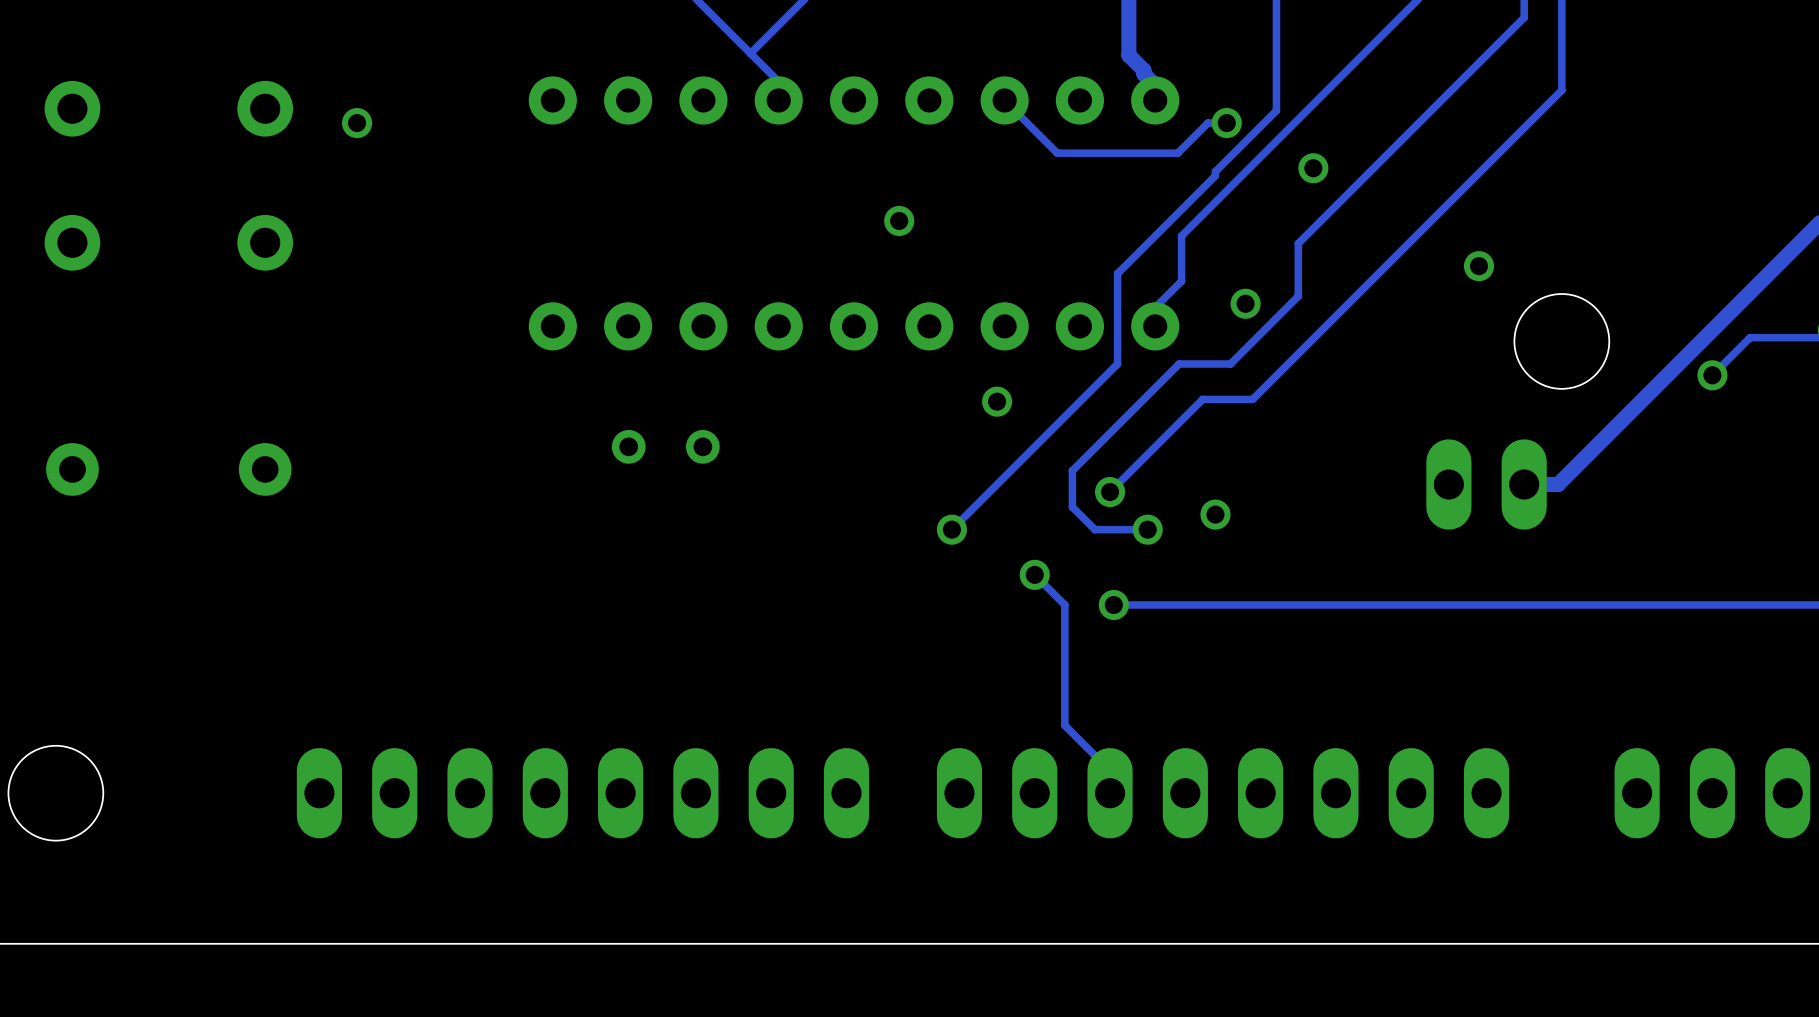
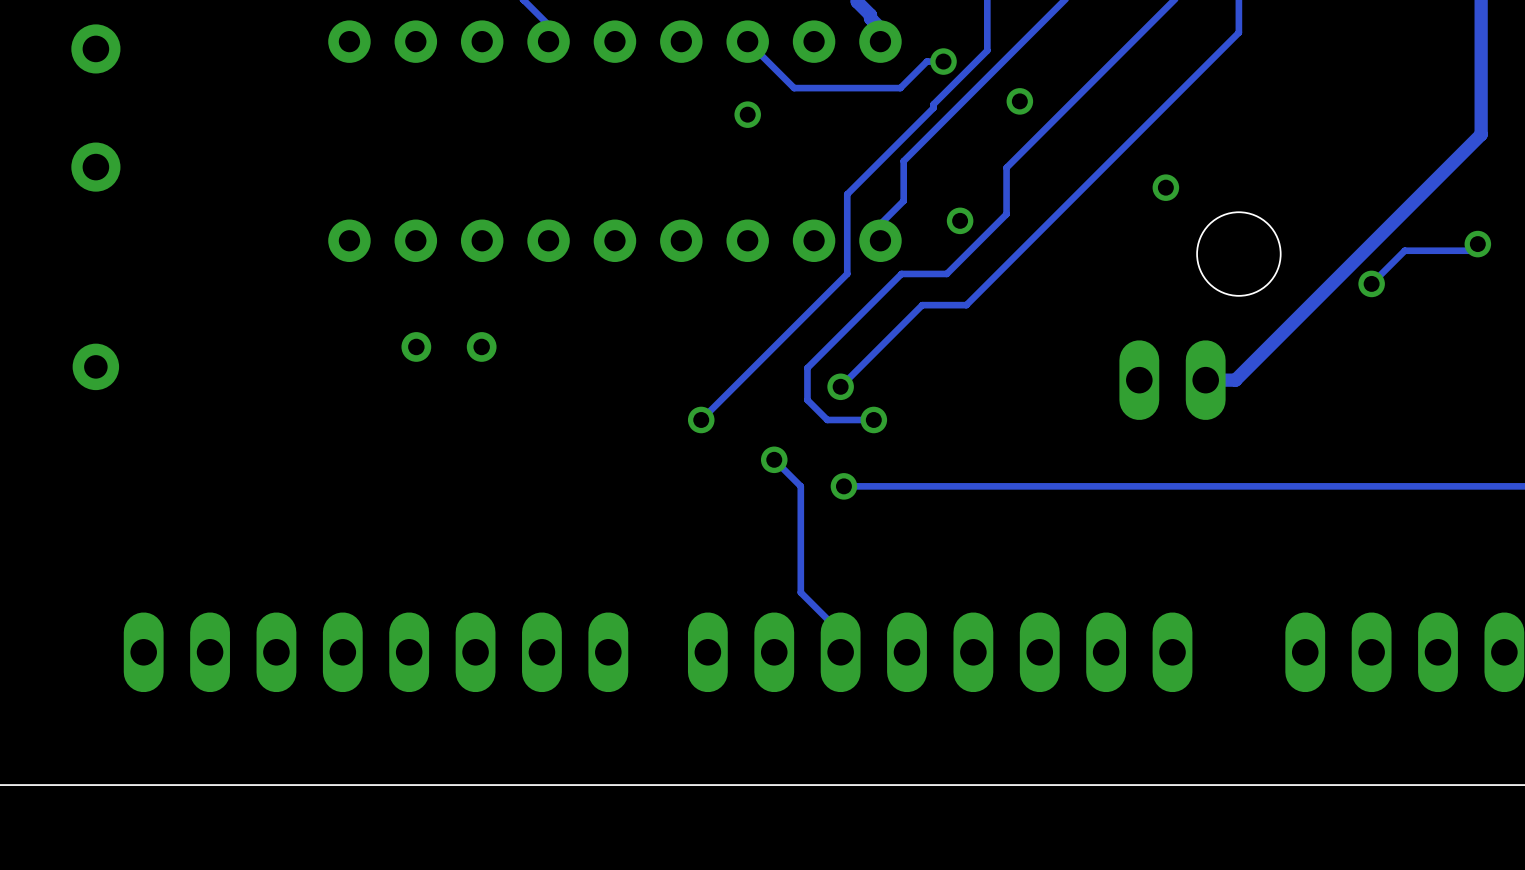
via: (357, 123) -> none
via: none -> (747, 114)
via: (899, 220) -> none
via: (997, 401) -> none
via: (1215, 514) -> none

